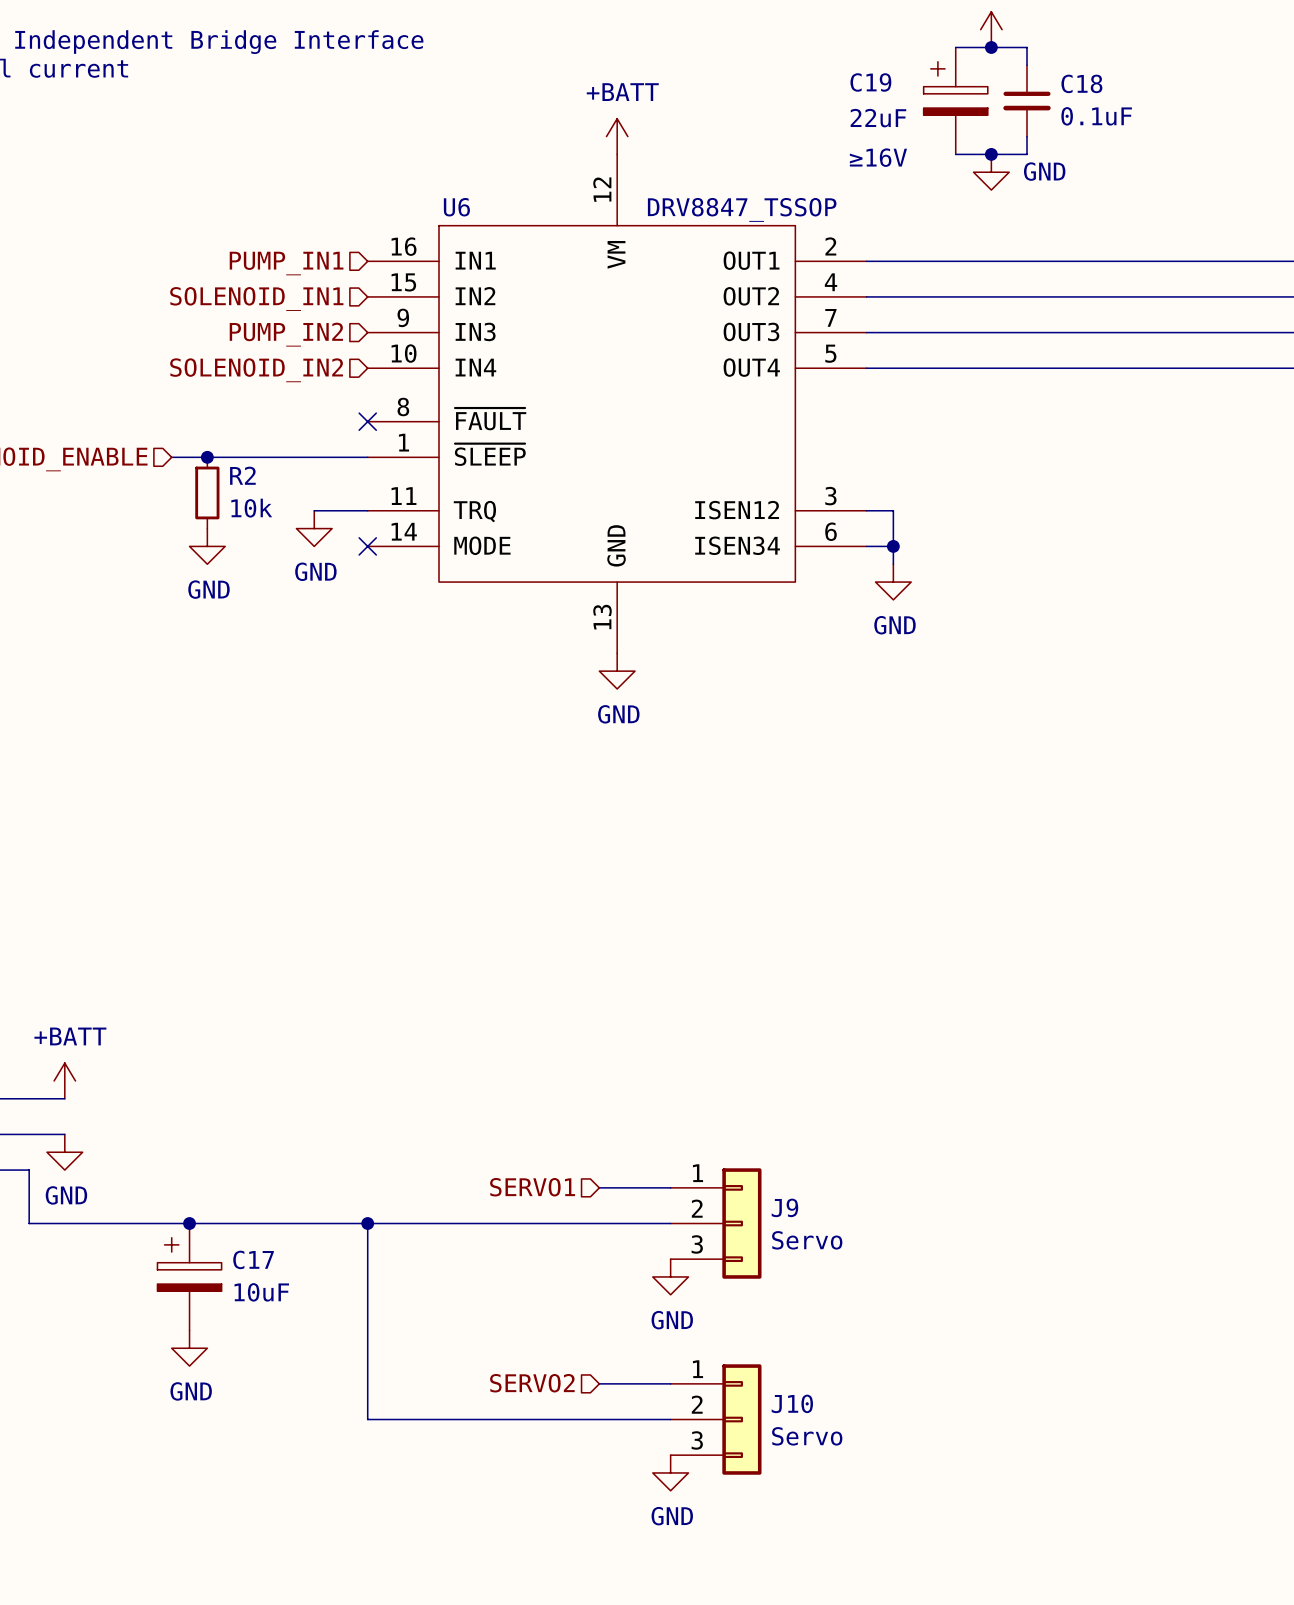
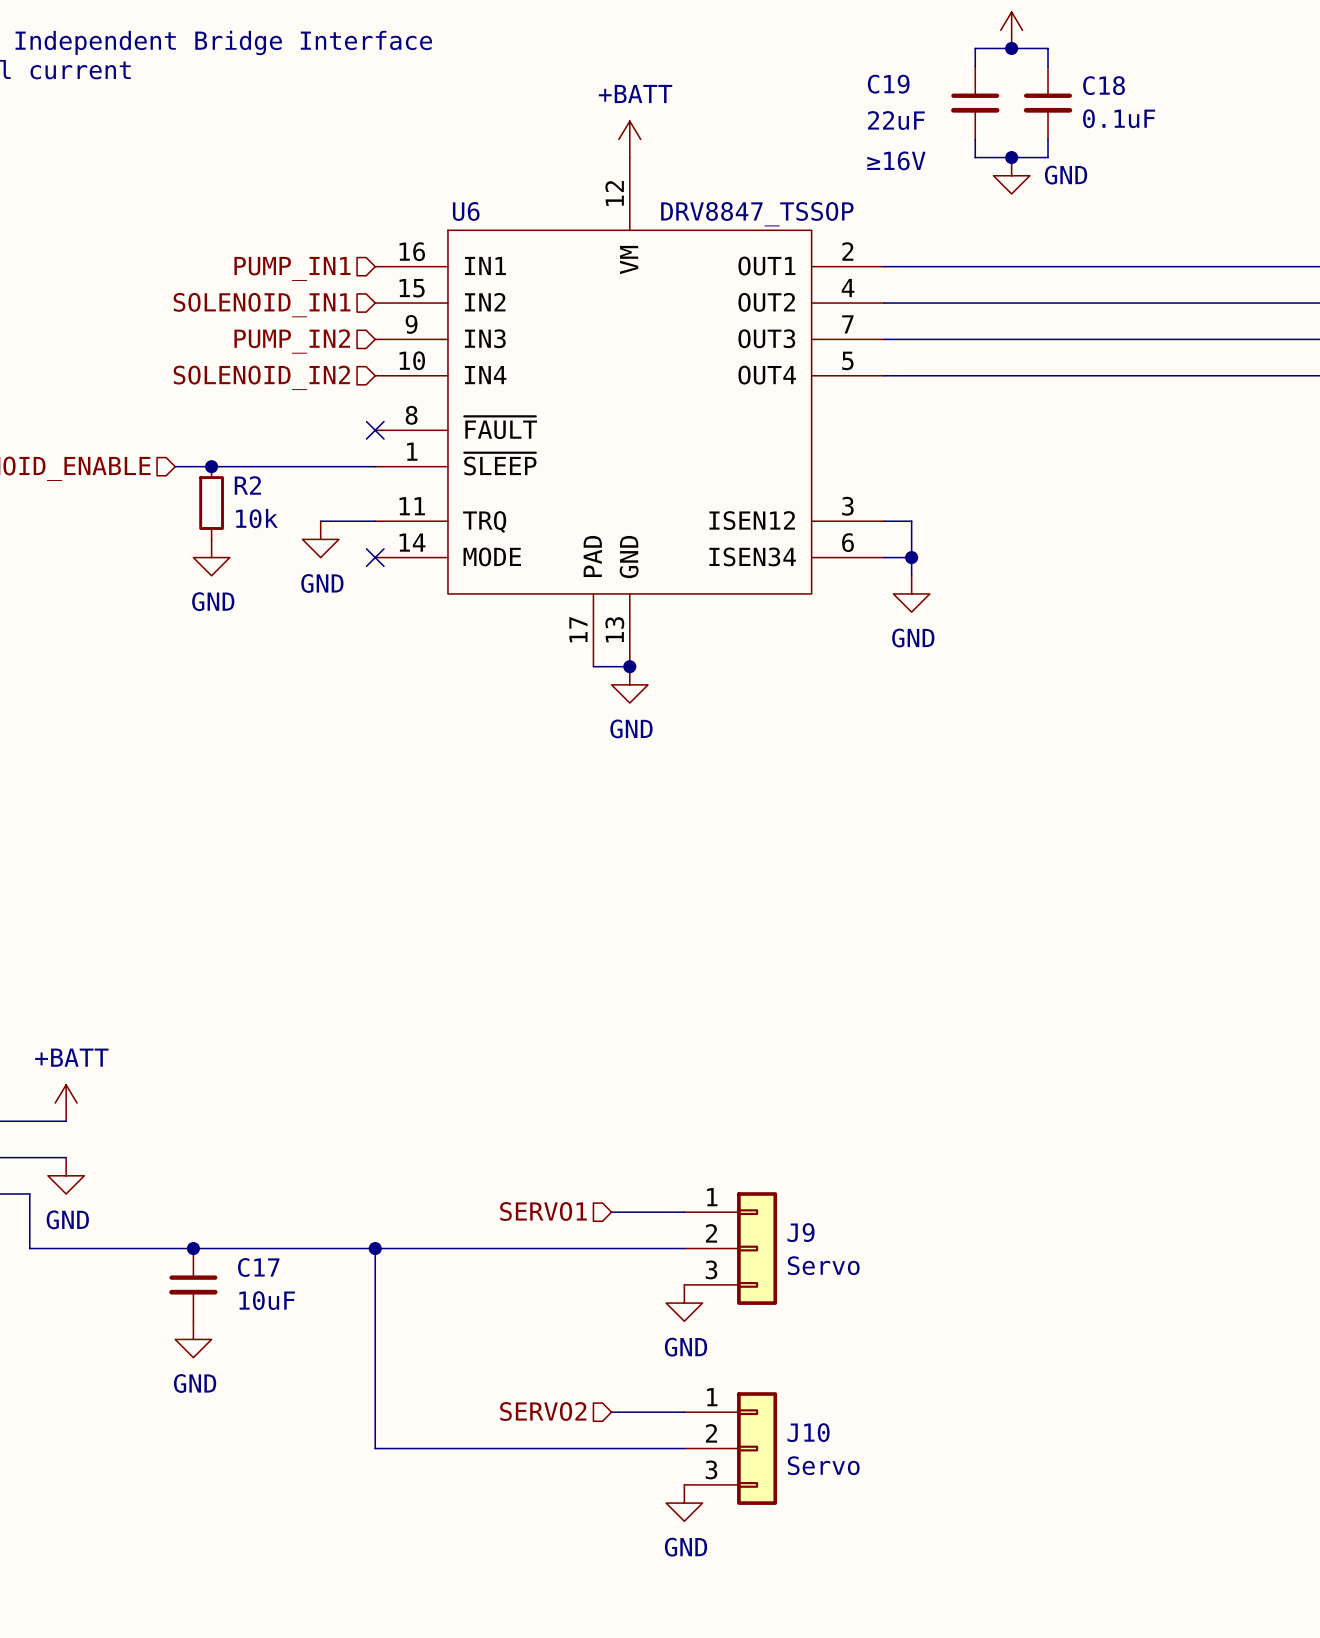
C19 symbol: [923, 47, 988, 155] -> [951, 66, 1000, 140]
U6 symbol: [367, 154, 867, 654] -> [375, 157, 885, 667]
wire: none -> (593, 666) (629, 666)
junction: none -> (629, 666)
C17 symbol: [157, 1223, 222, 1331] -> [169, 1248, 218, 1322]
power symbol position: GND (189, 1348) -> GND (193, 1339)

